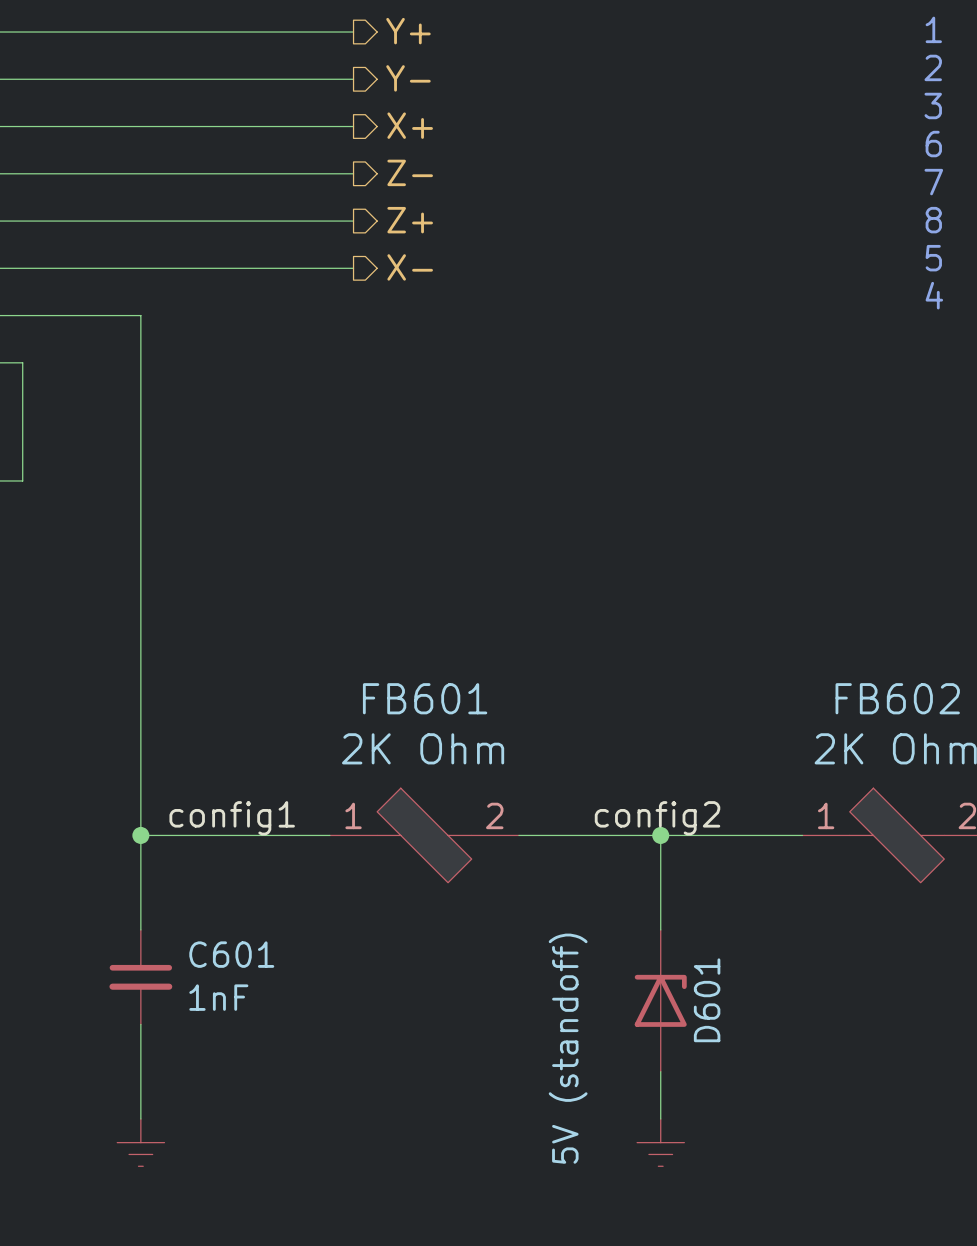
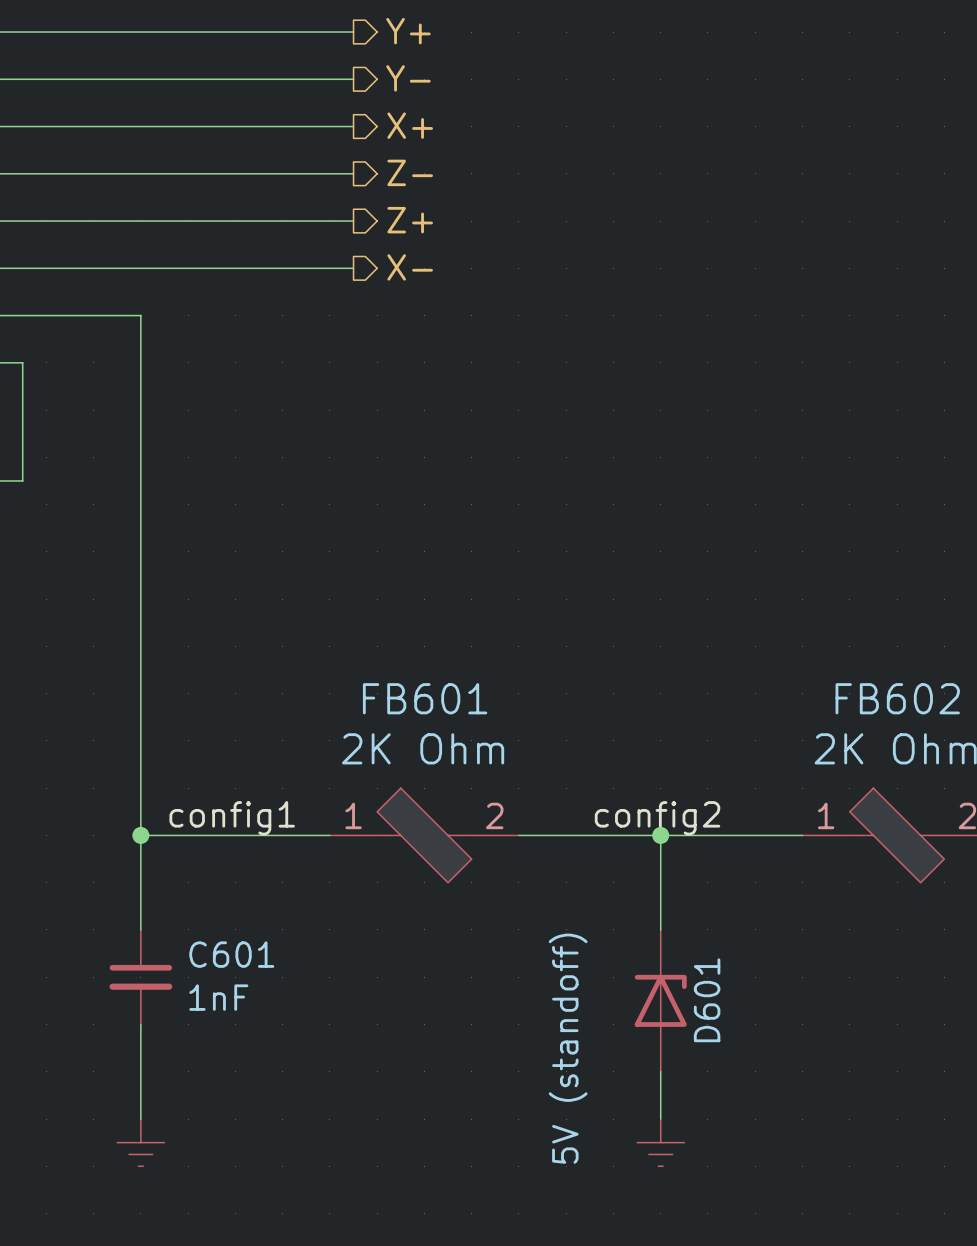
text: 1 (933, 29) -> none
text: 2 (933, 67) -> none
text: 3 (933, 105) -> none
text: 6 (933, 144) -> none
text: 7 (933, 182) -> none
text: 8 (933, 220) -> none
text: 5 (933, 258) -> none
text: 4 (934, 295) -> none

